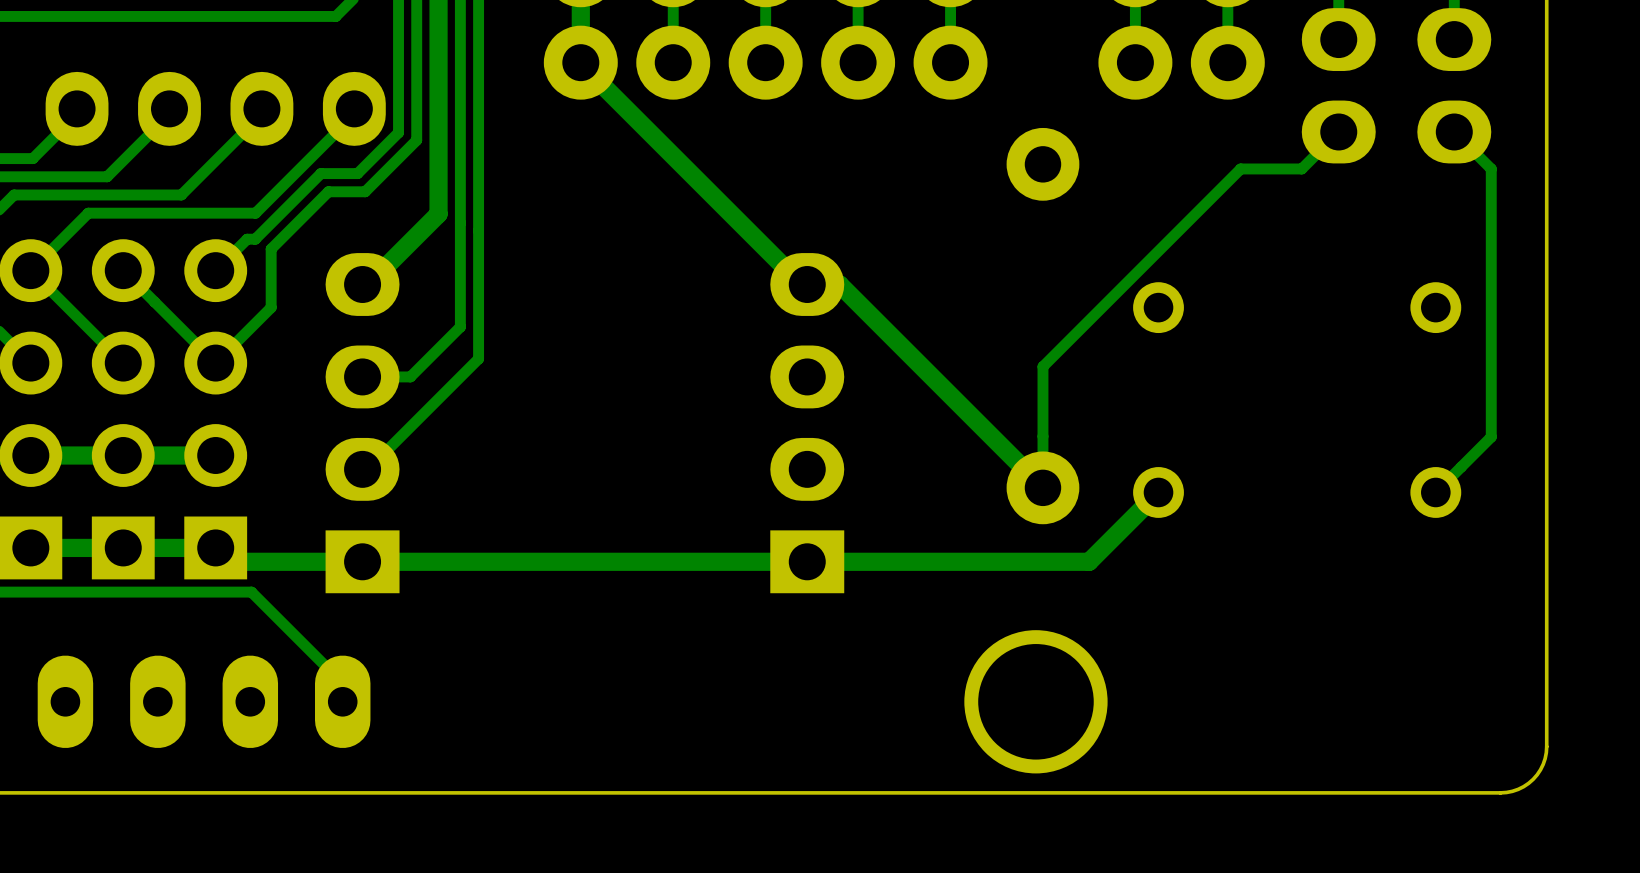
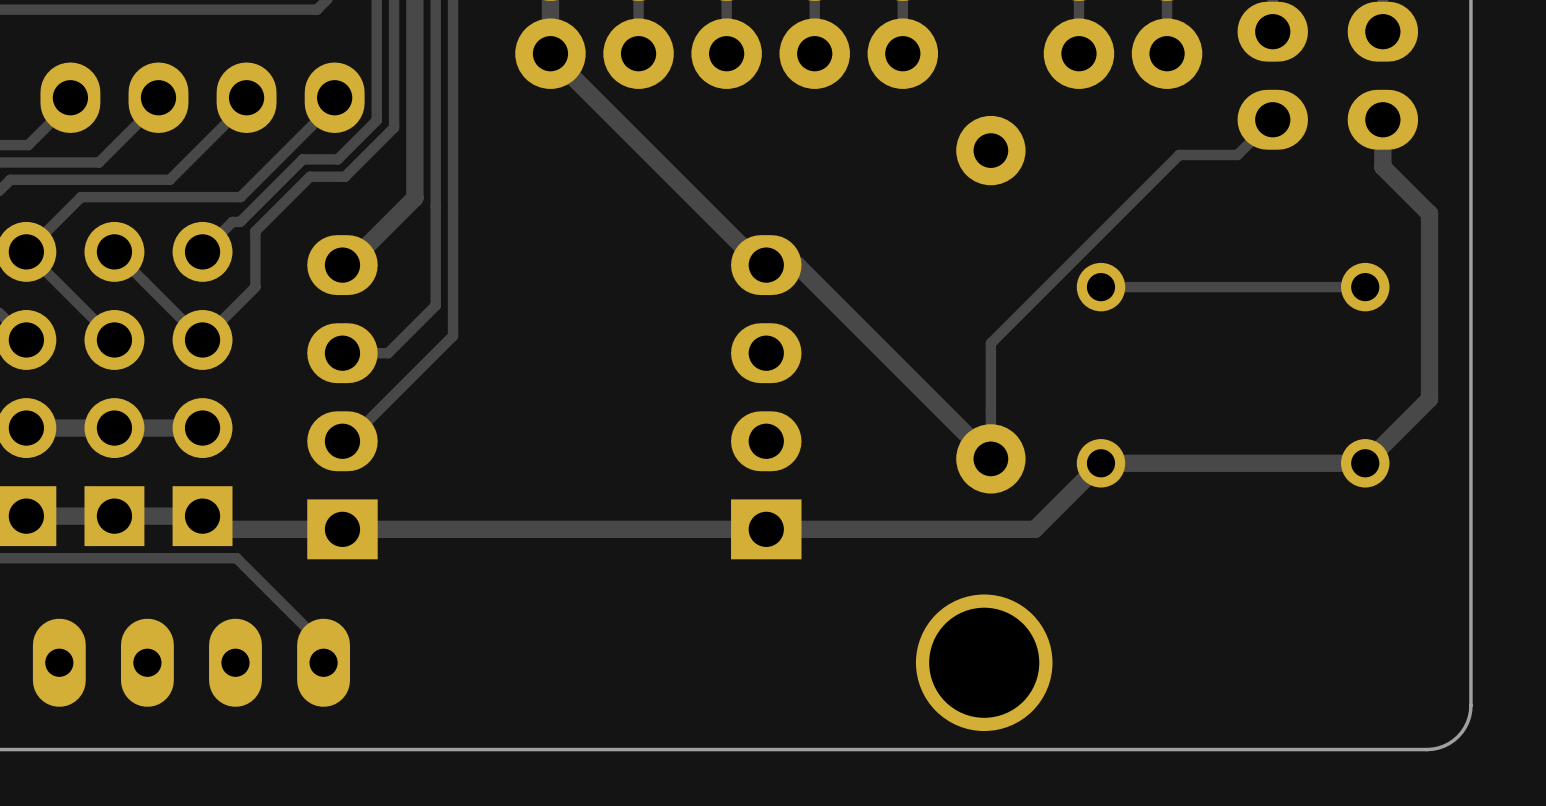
track: (1454, 131) (1491, 168) (1491, 437) -> (1382, 119) (1382, 167) (1429, 213) (1429, 398) (1418, 410)
track: none -> (1365, 287) (1100, 287)
track width: thin (1491, 437) (1435, 492) -> thick (1418, 410) (1365, 463)
track: none -> (1365, 463) (1100, 463)

